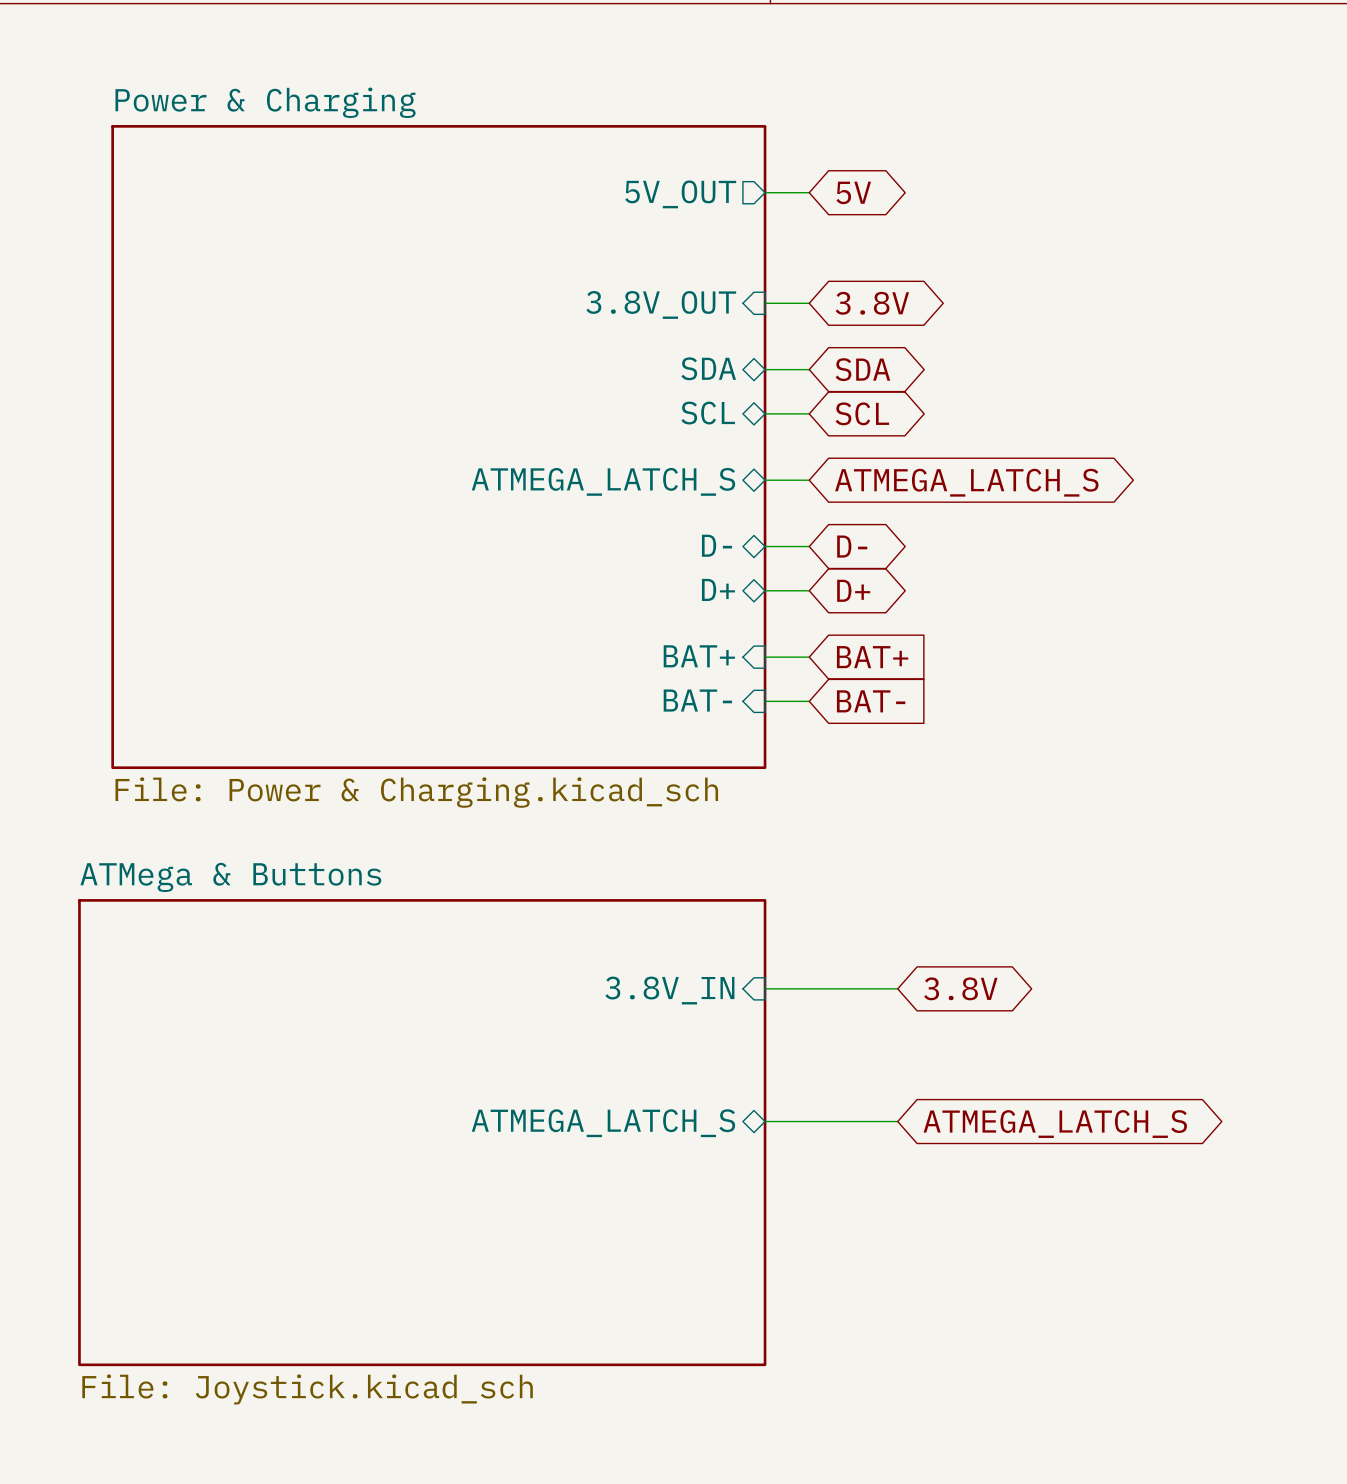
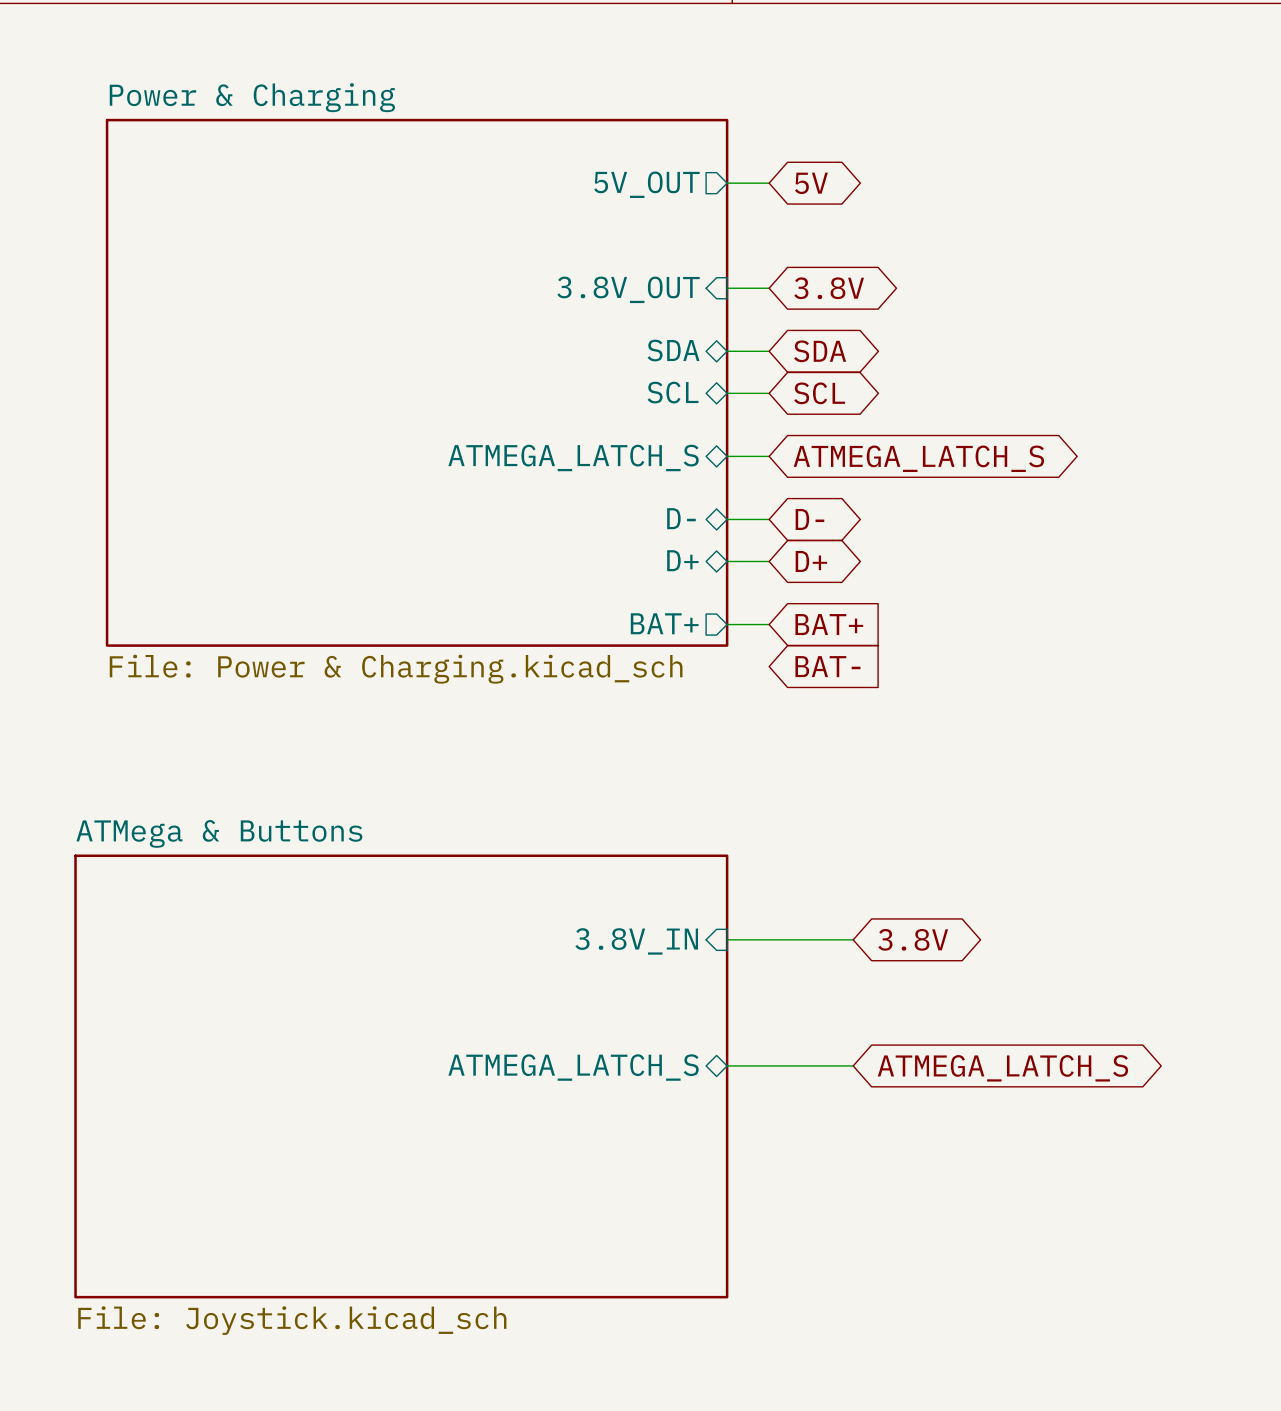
sheet Power & Charging: none -> File: Power & Charging.kicad_sch (417, 382)
sheet Power & Charging: File: Power & Charging.kicad_sch (438, 447) -> none
sheet pin shape: input (699, 656) -> output (664, 623)
sheet pin: BAT- (697, 700) -> none
wire: (765, 701) (809, 701) -> none

